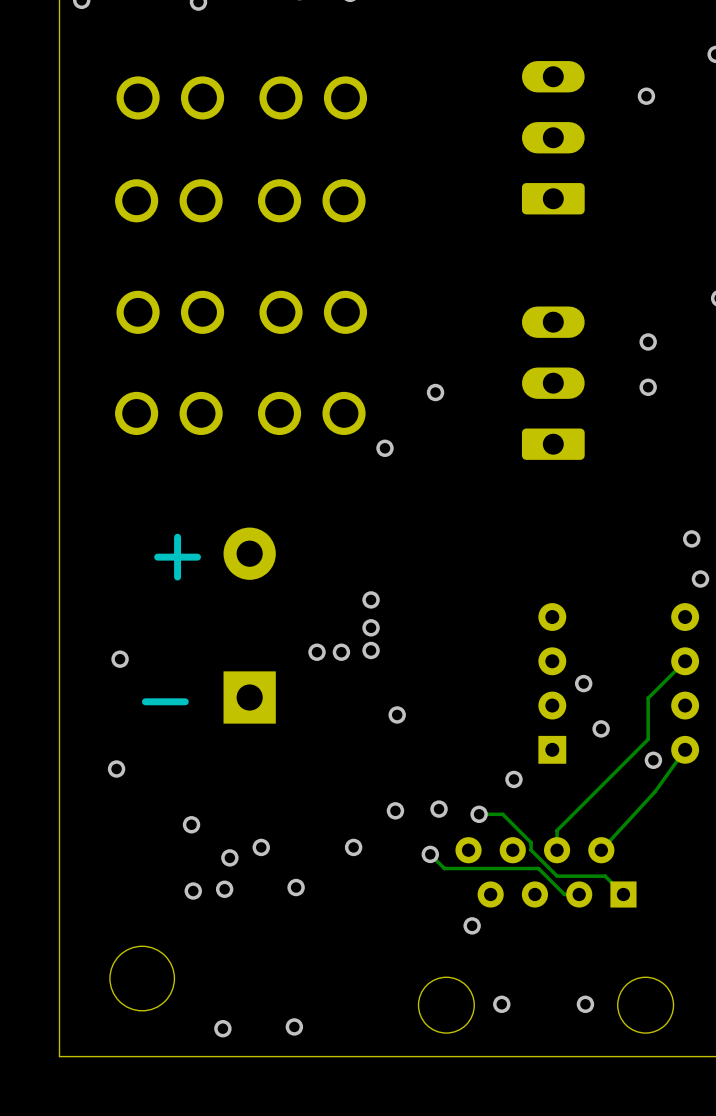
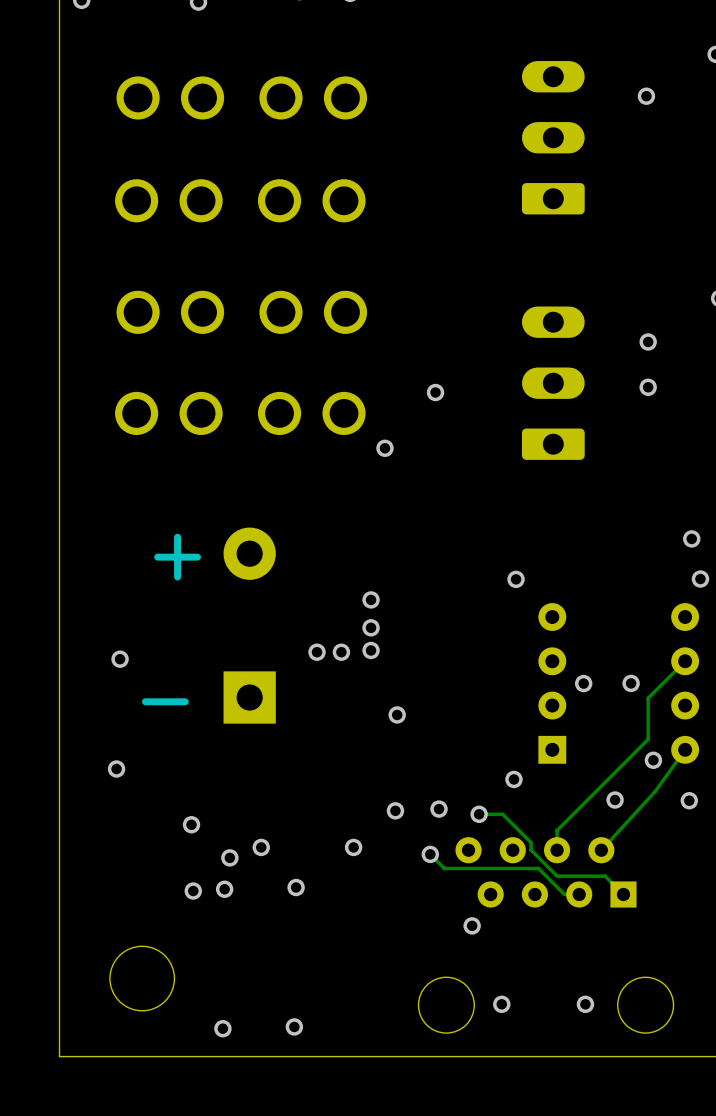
via: none -> (516, 579)
via: none -> (631, 683)
via: (601, 728) -> none
via: none -> (615, 800)
via: none -> (689, 800)

